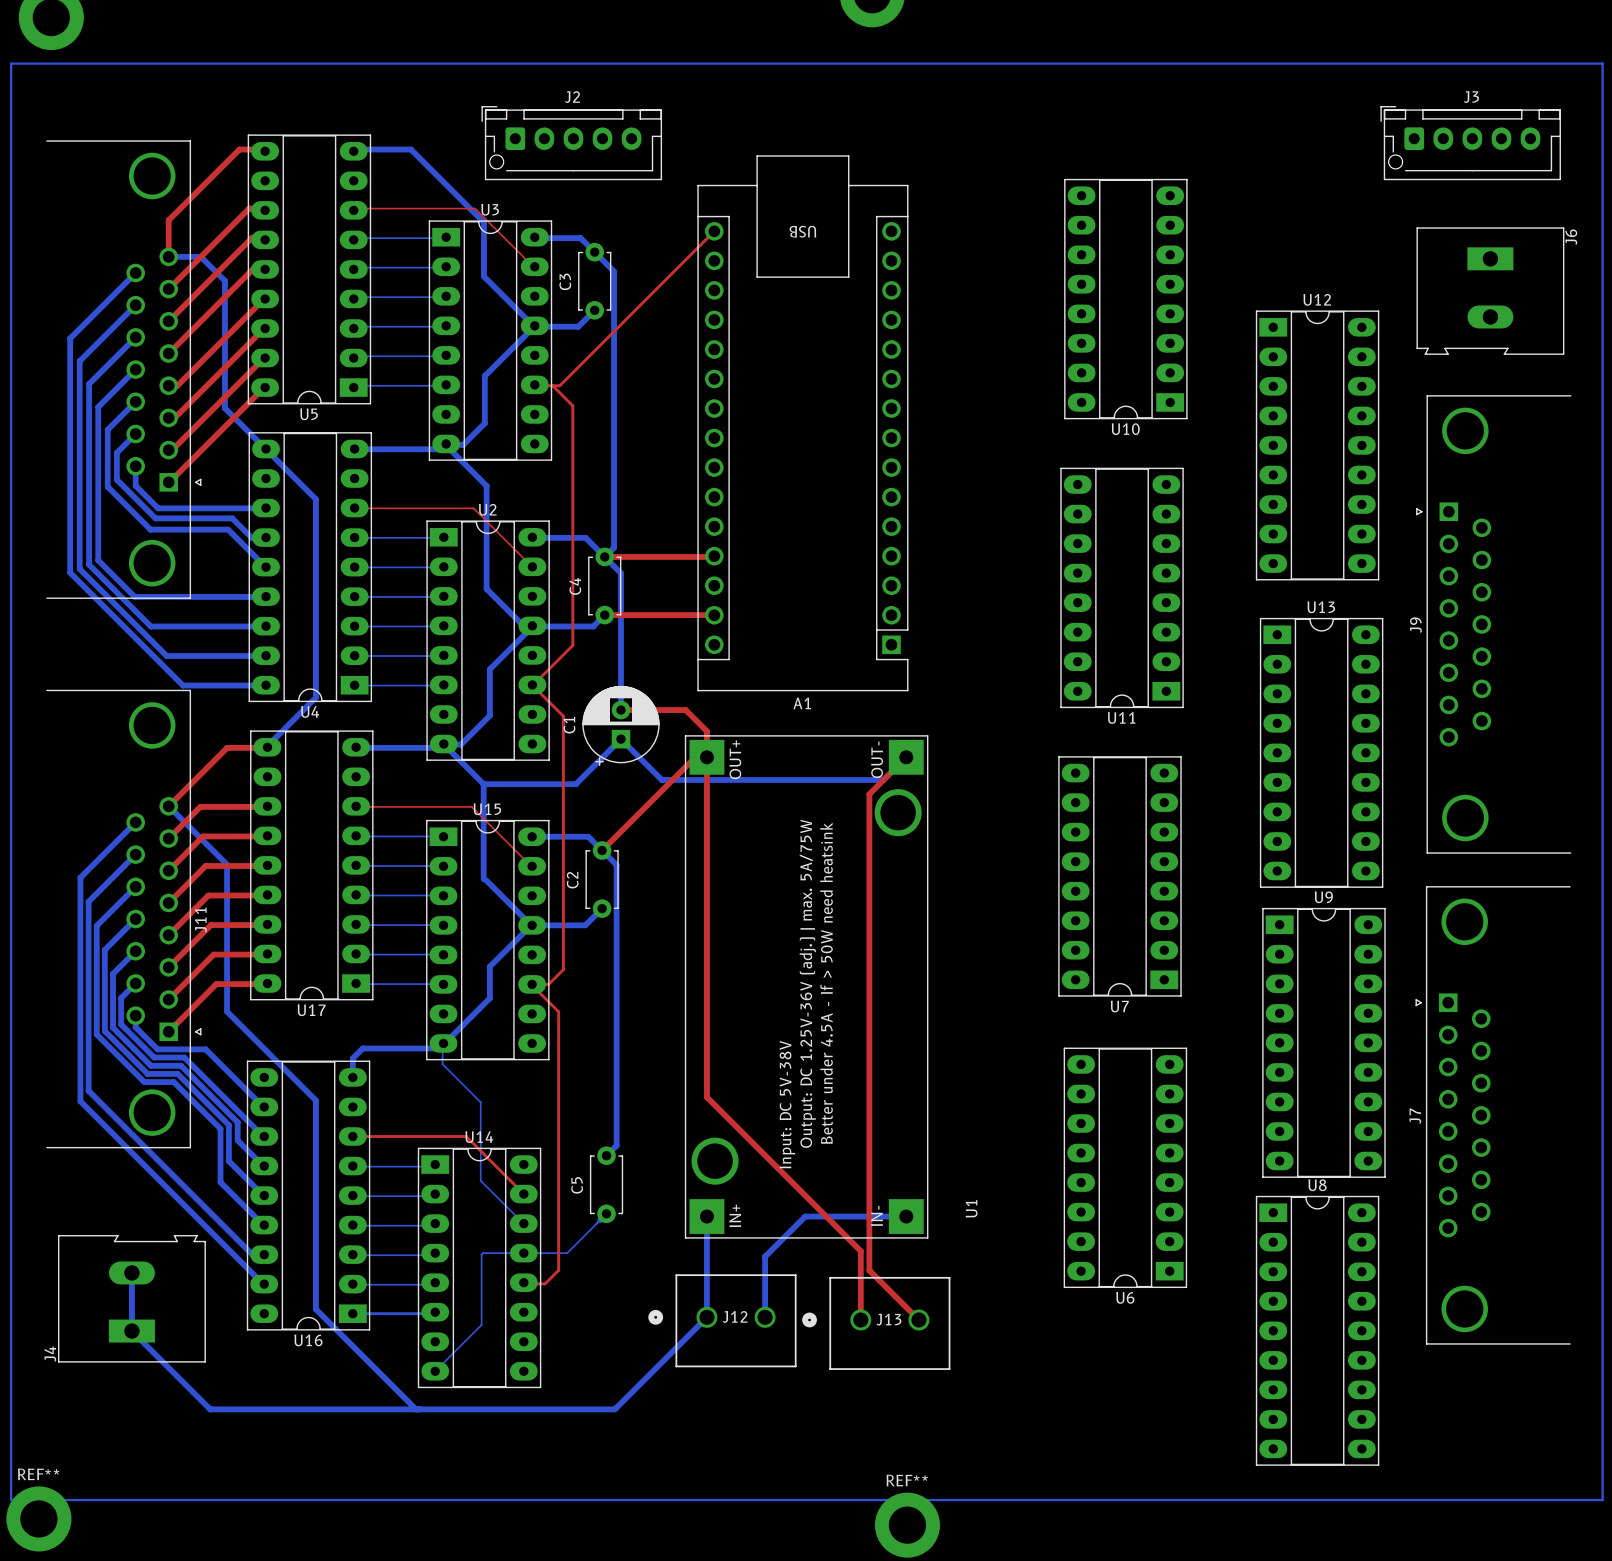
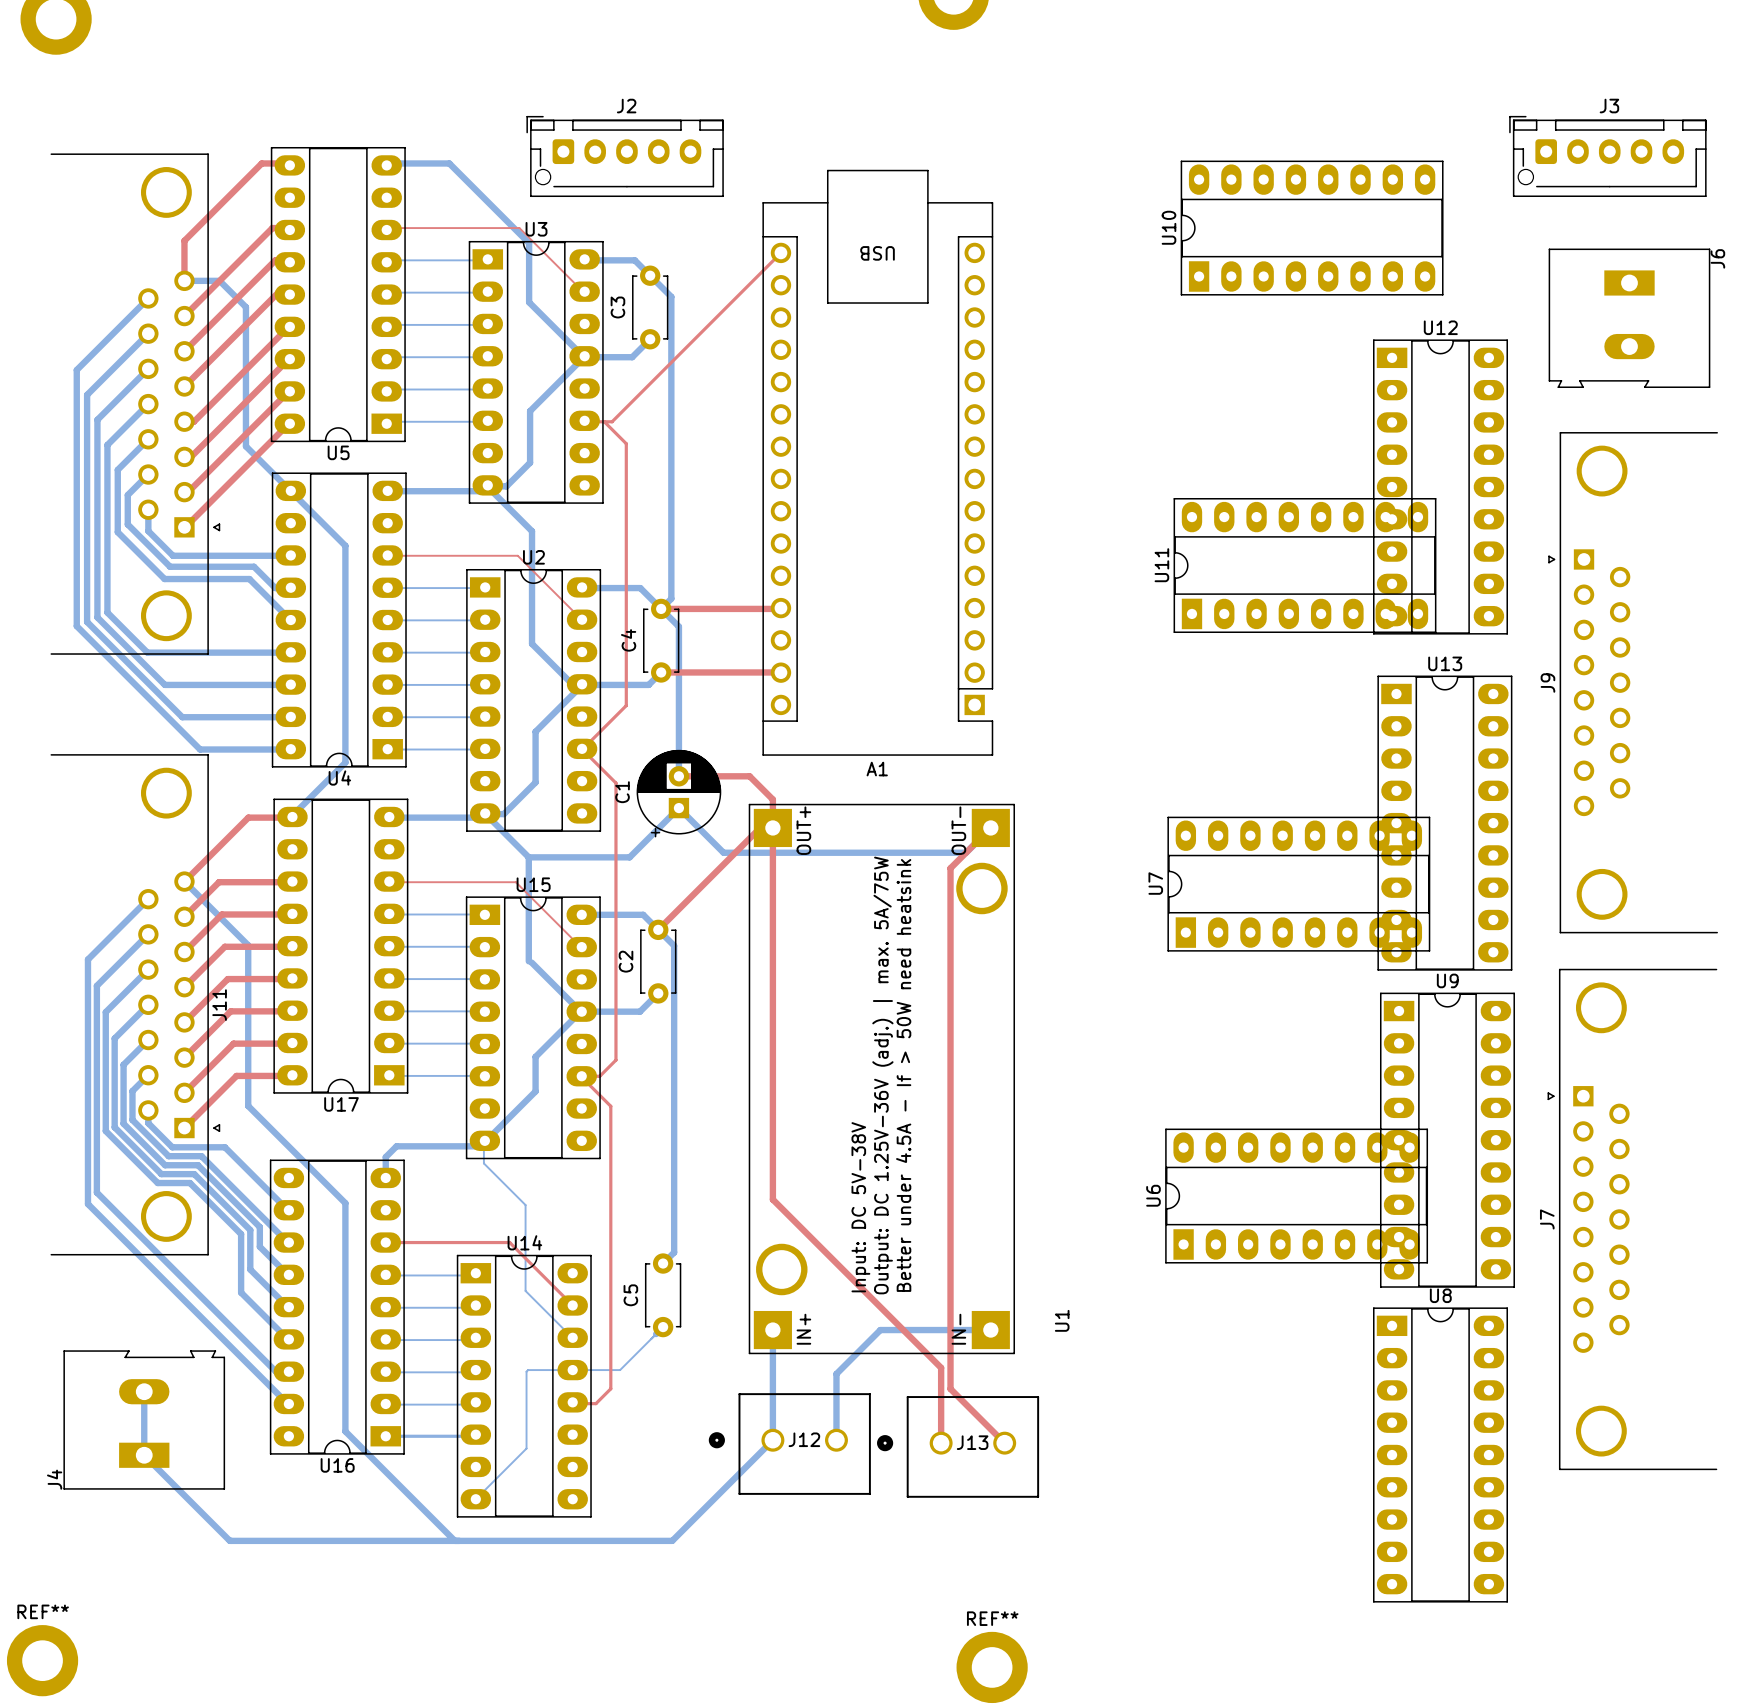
bottom track: (11, 63) (1602, 63) (1602, 1500) (11, 1500) (11, 63) -> none
U10 rotation: 0° (1125, 299) -> 90° clockwise (1312, 228)
U11 rotation: 0° (1122, 587) -> 90° clockwise (1304, 565)
U7 rotation: 0° (1119, 876) -> 90° clockwise (1298, 884)
U6 rotation: 0° (1125, 1167) -> 90° clockwise (1296, 1196)

